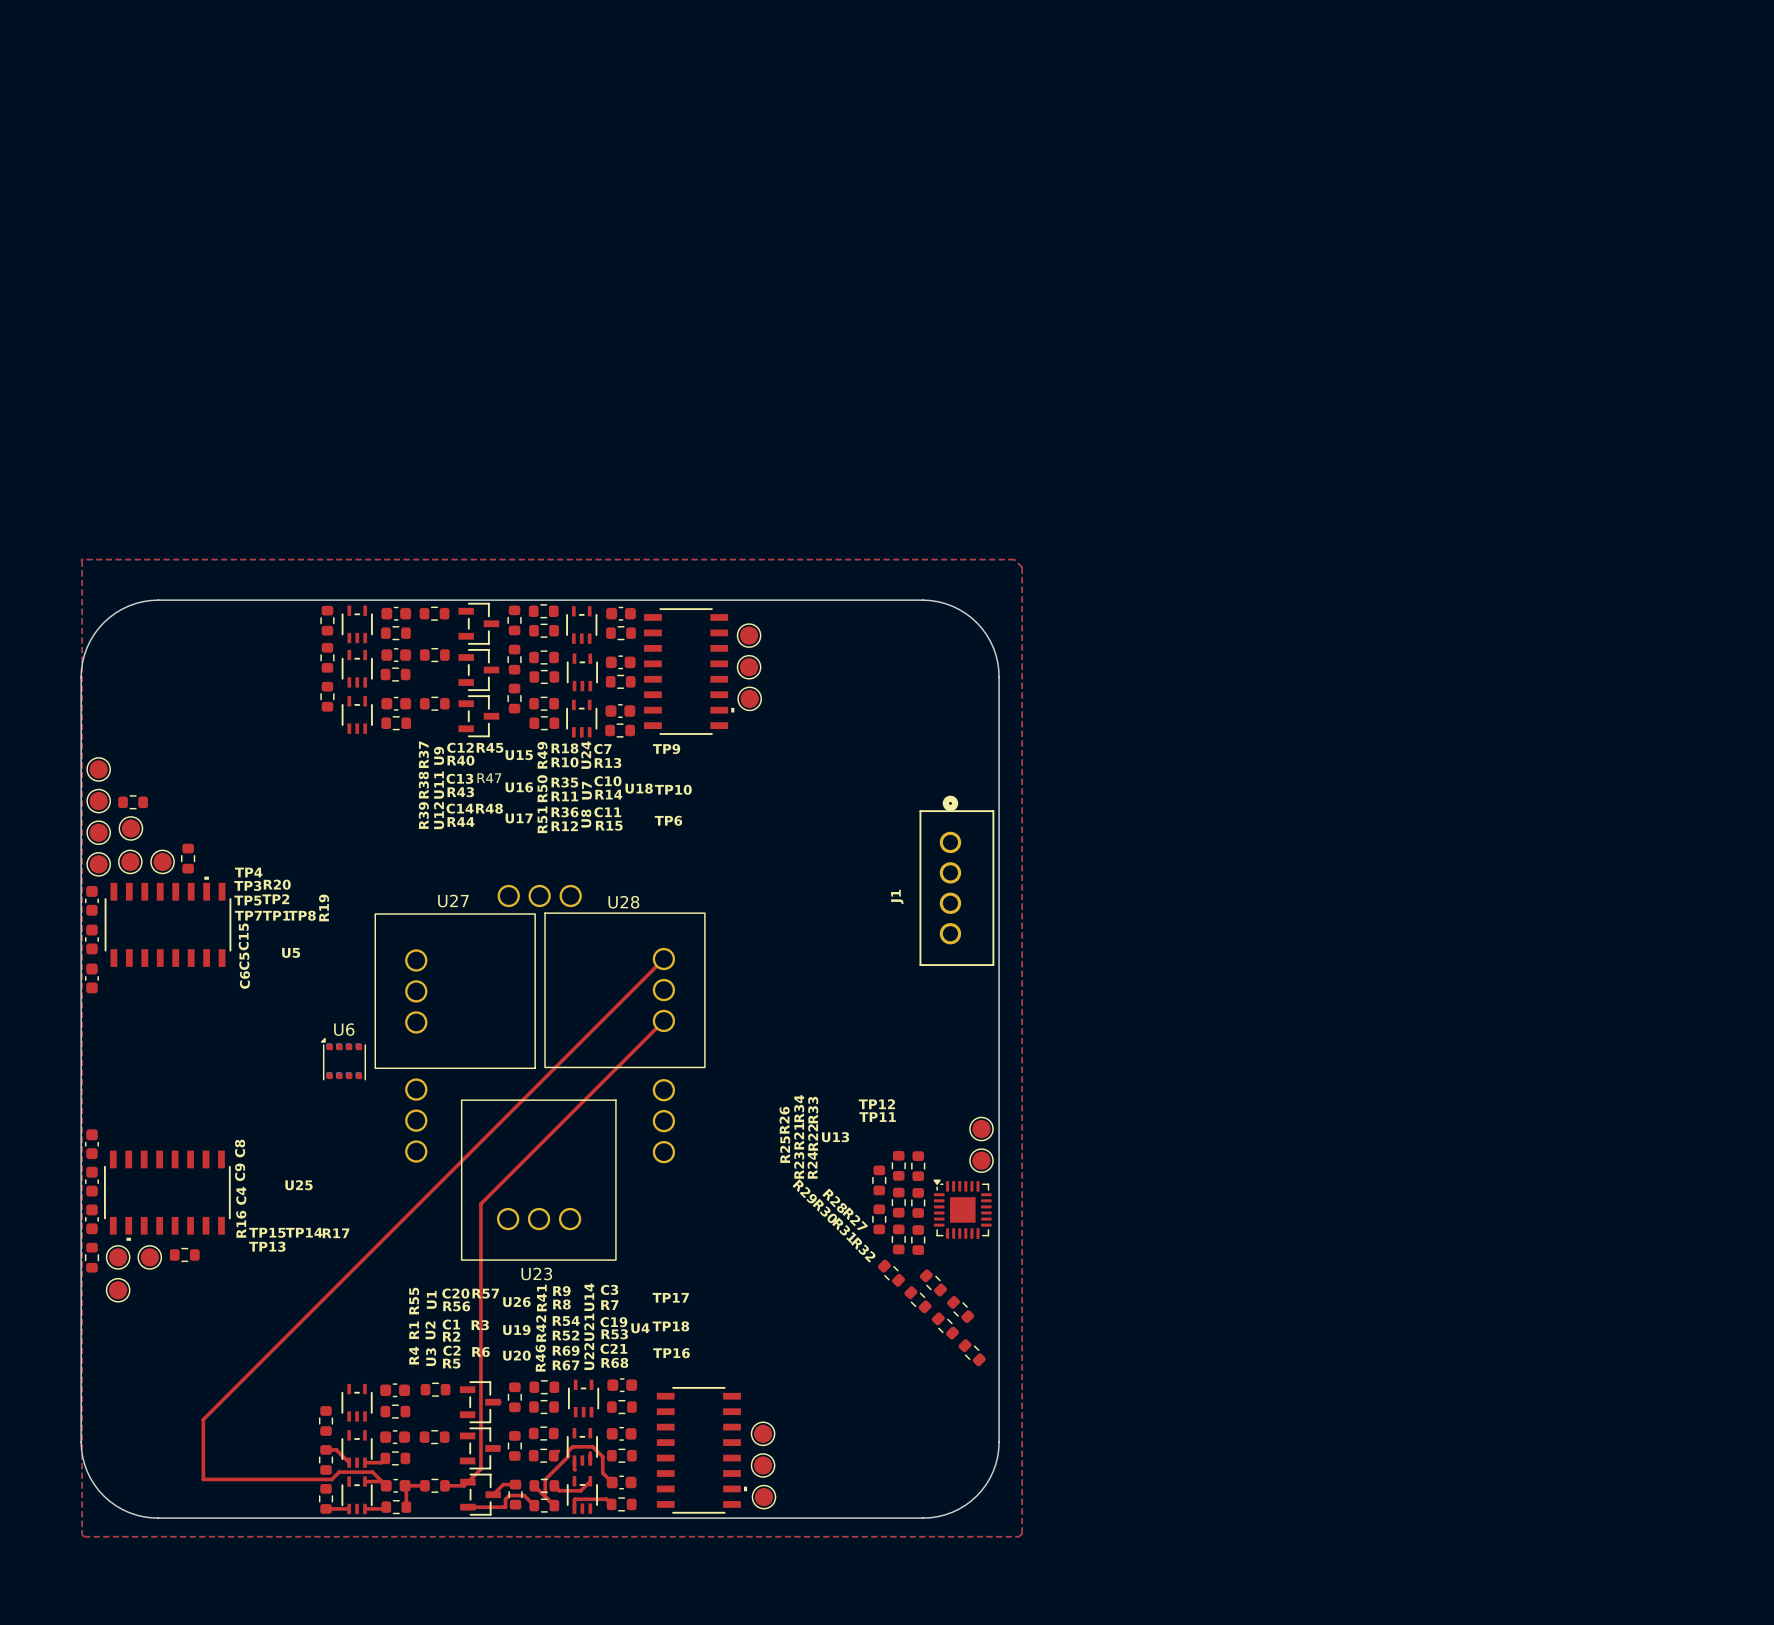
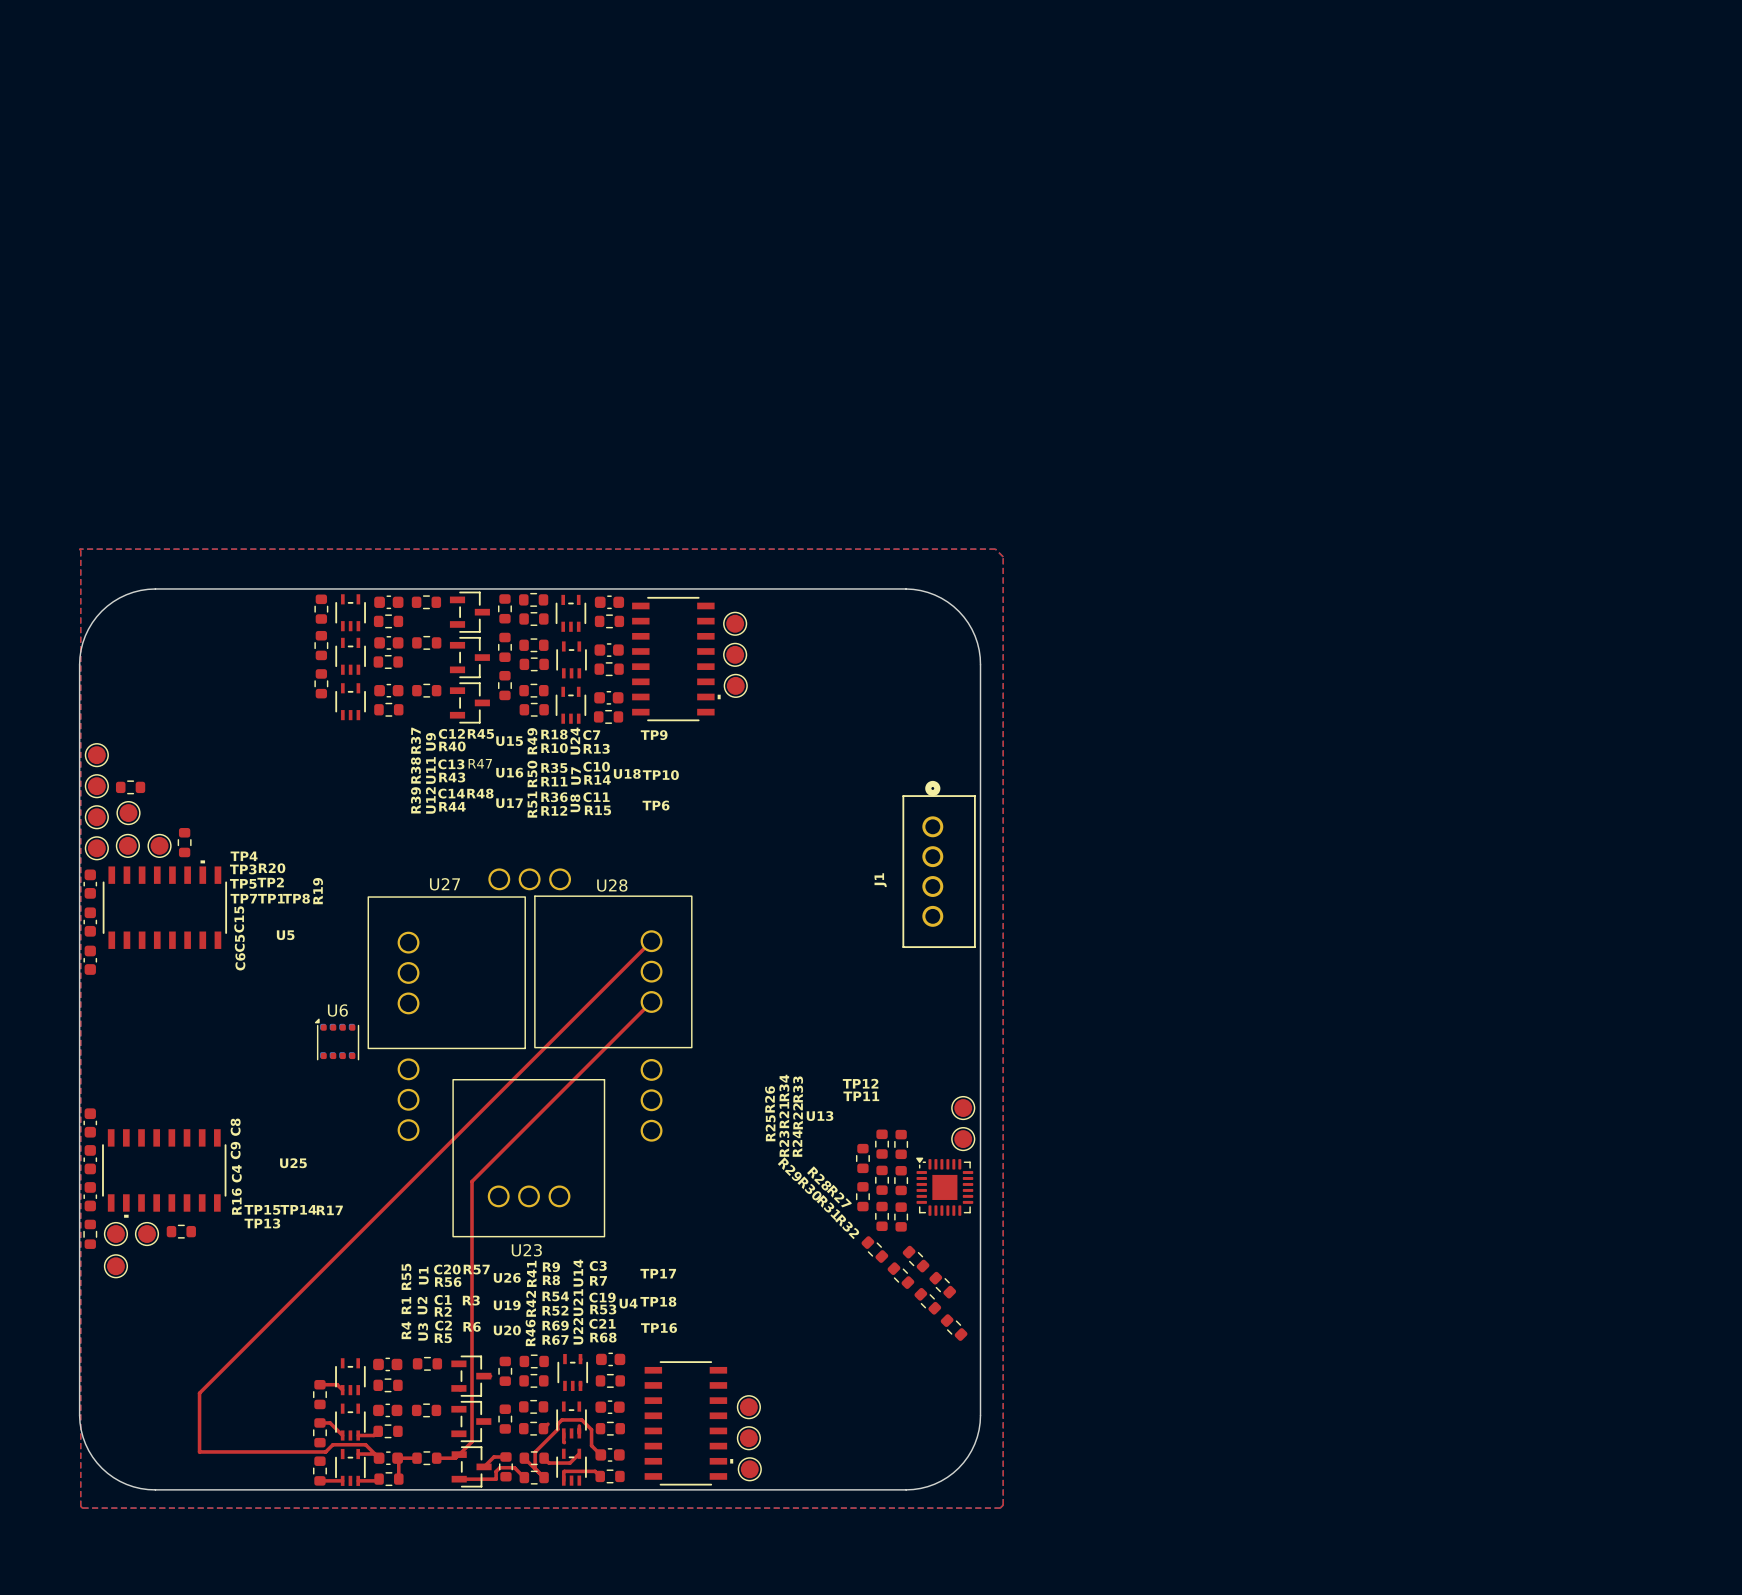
top track: none -> (319, 1384) (337, 1384) (342, 1390)

